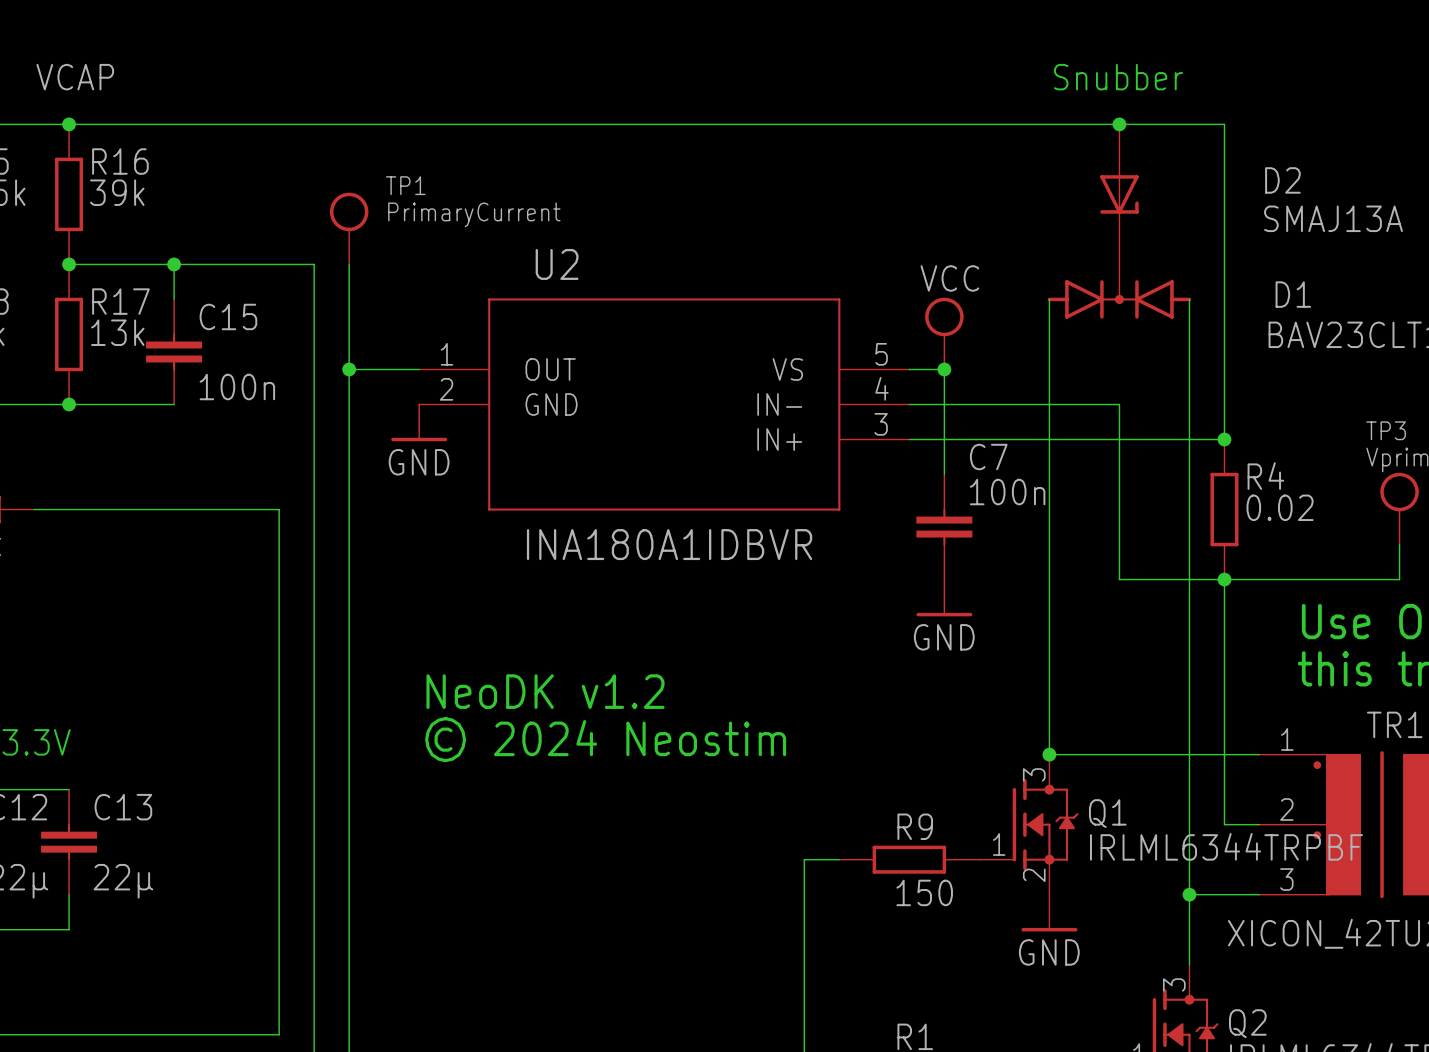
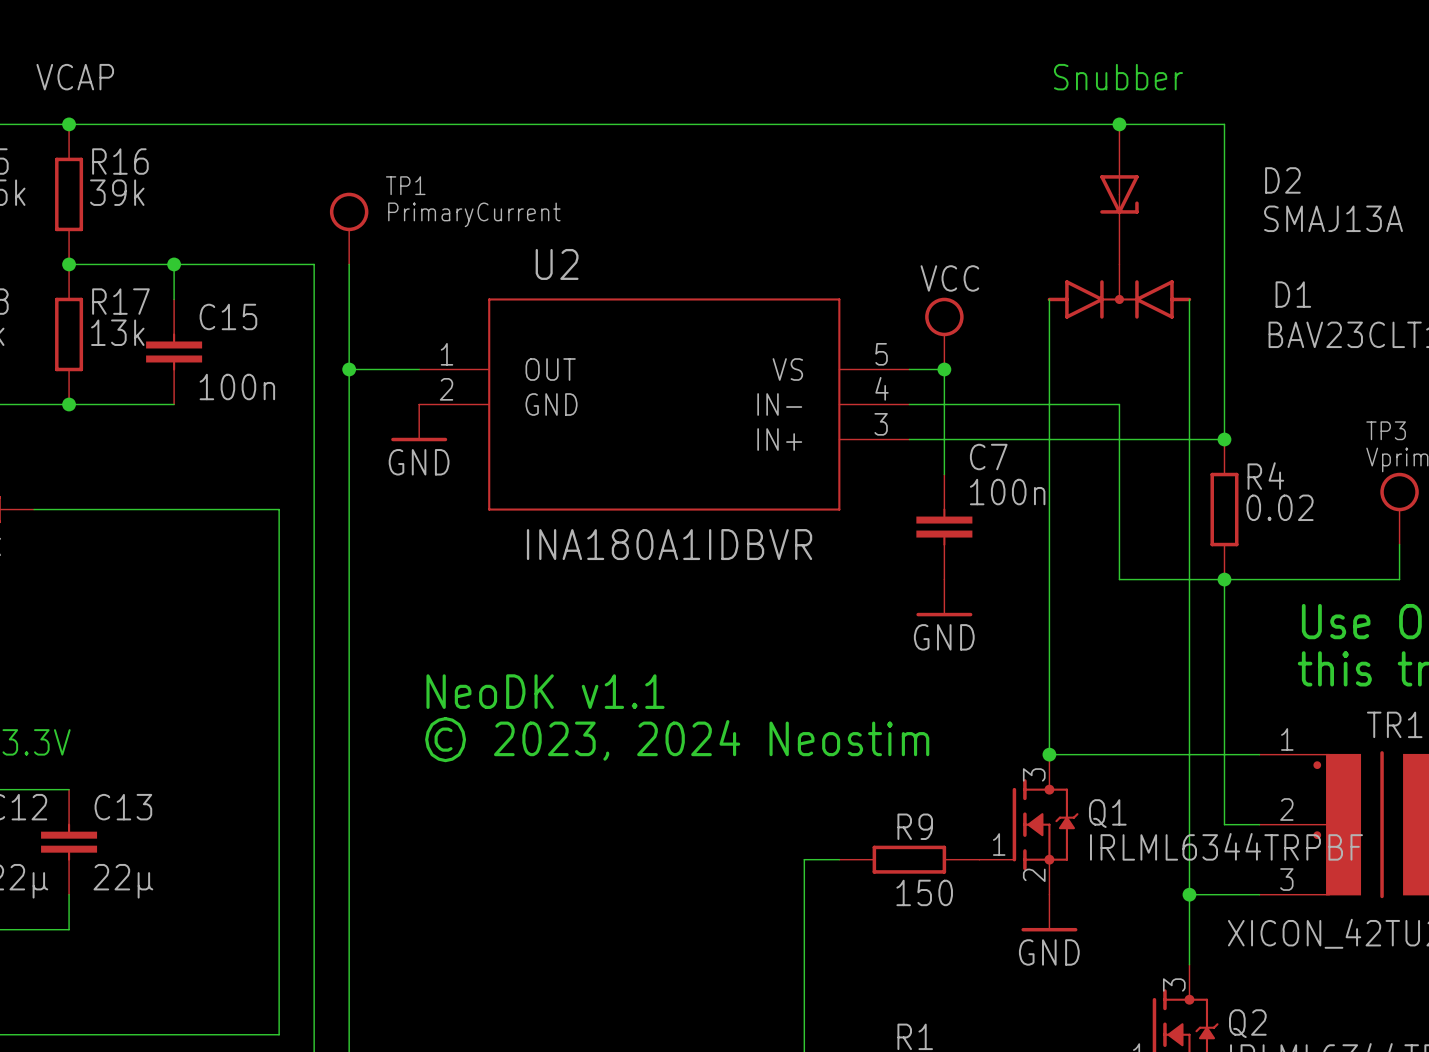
text: NeoDK v1.2 (545, 691) -> NeoDK v1.1 (545, 691)
text: © 2024 Neostim (605, 739) -> © 2023, 2024 Neostim (677, 739)

